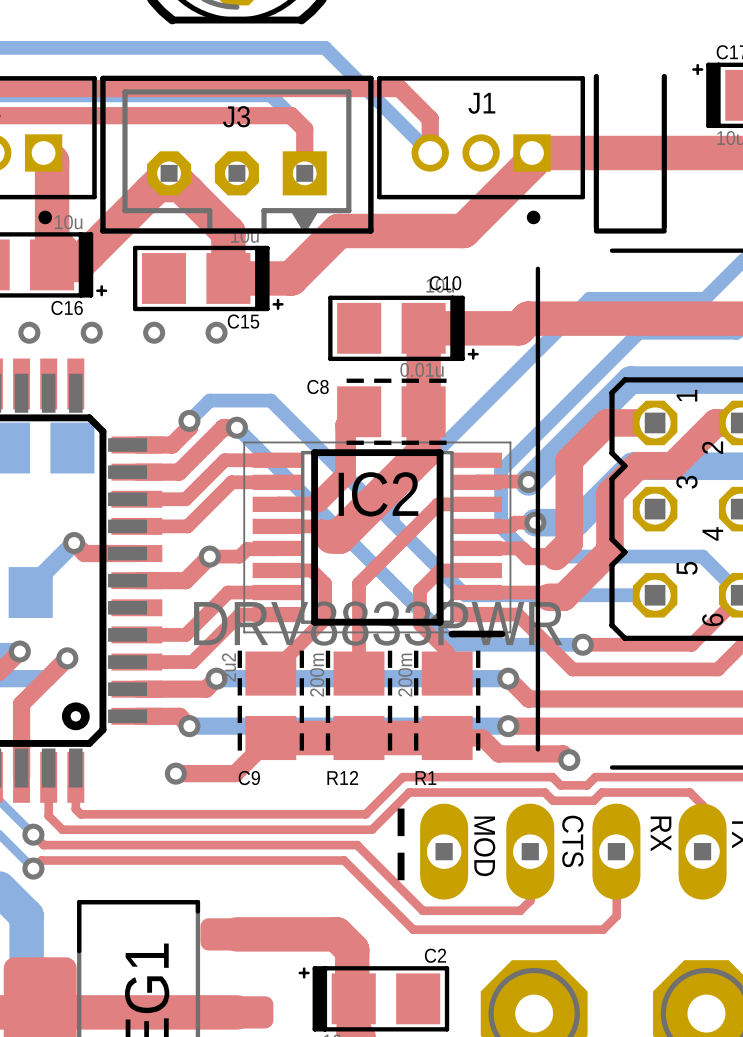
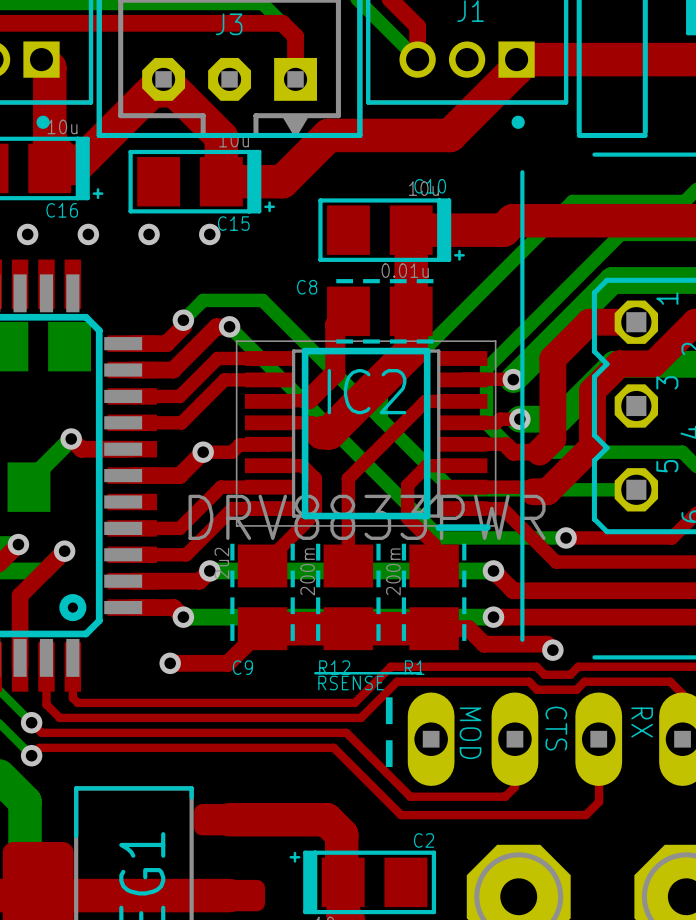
line: none -> (315, 673) (420, 673)
text: none -> RSENSE (351, 683)

